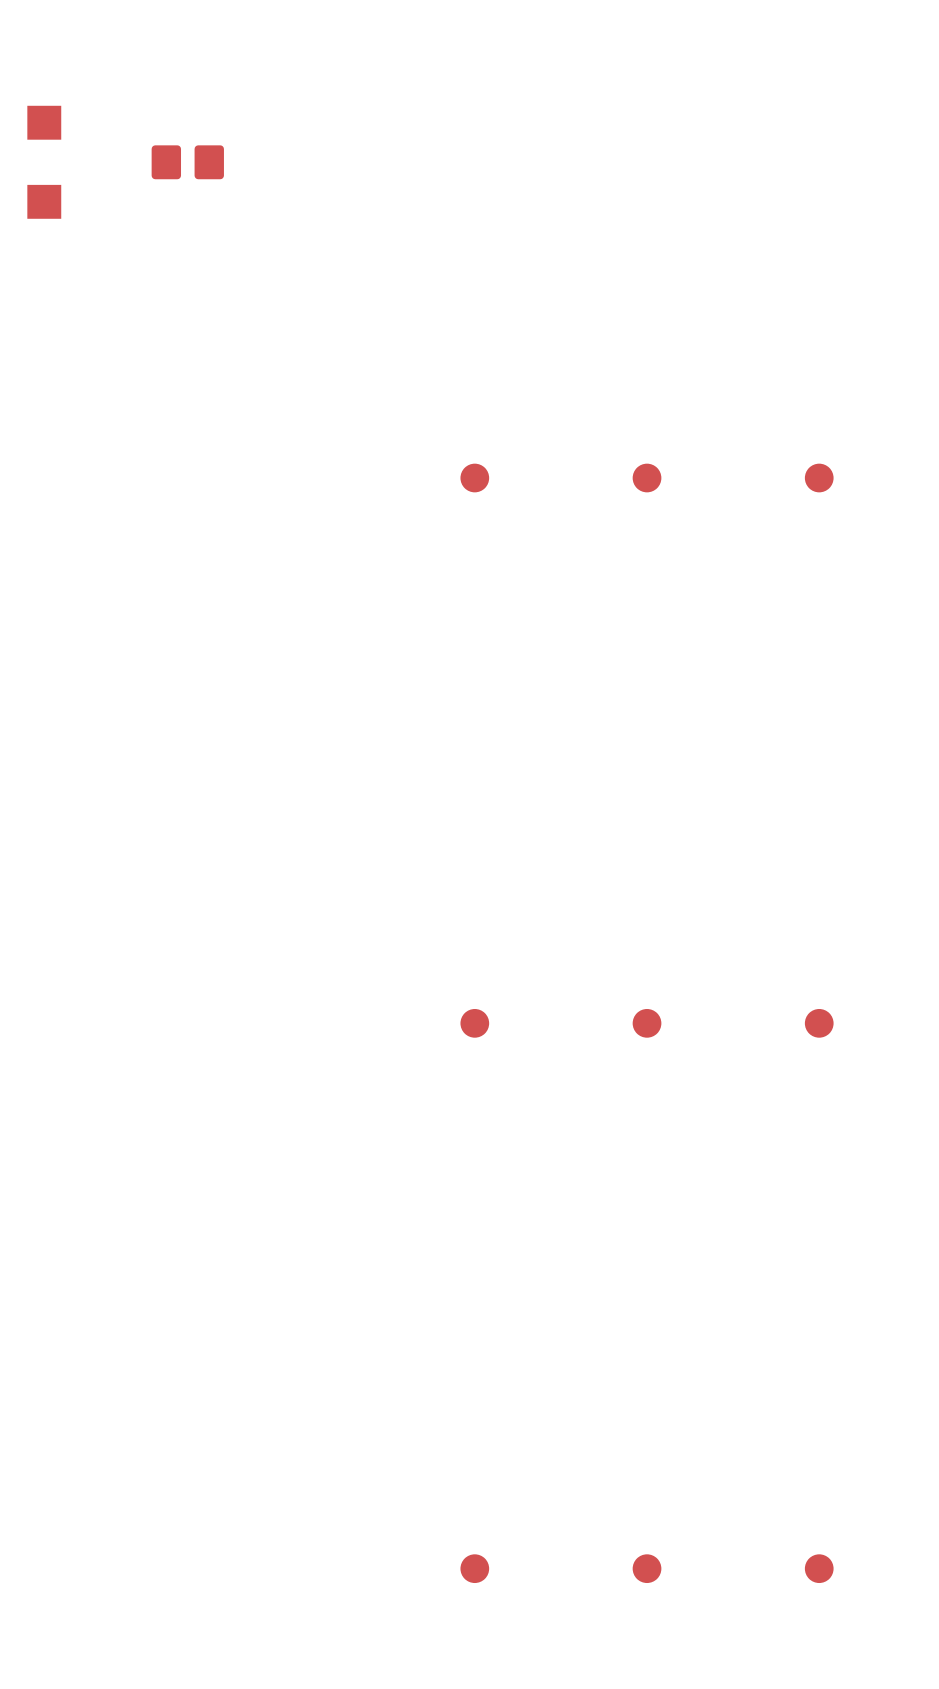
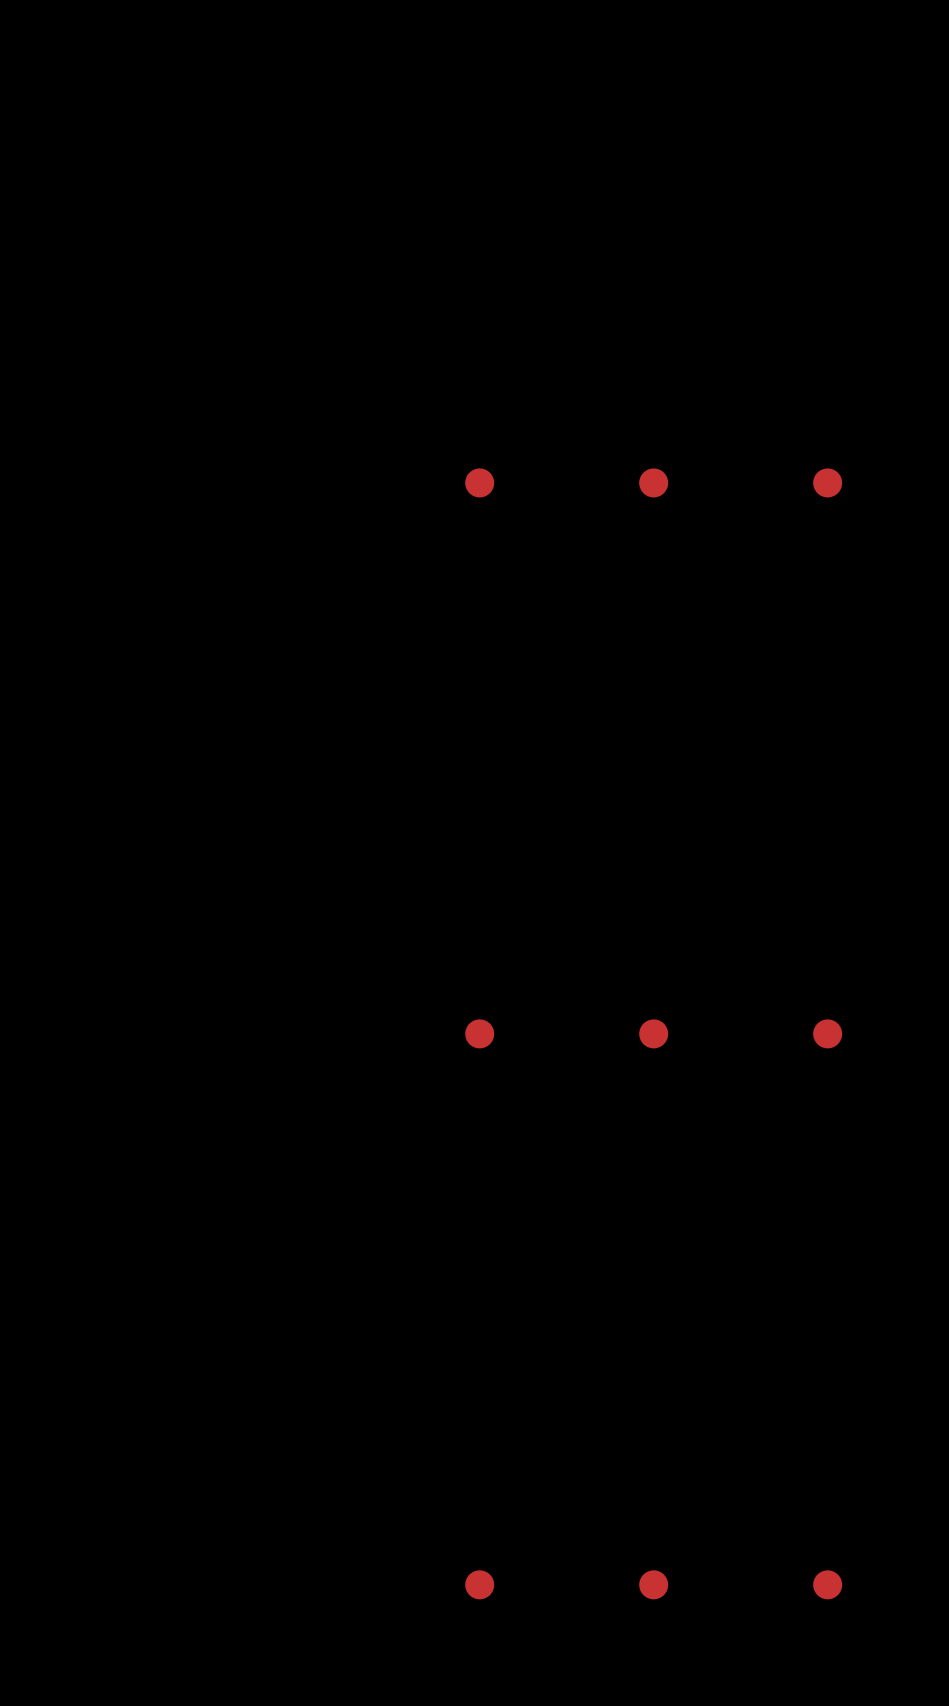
part: (44, 162) -> none
part: (187, 162) -> none

